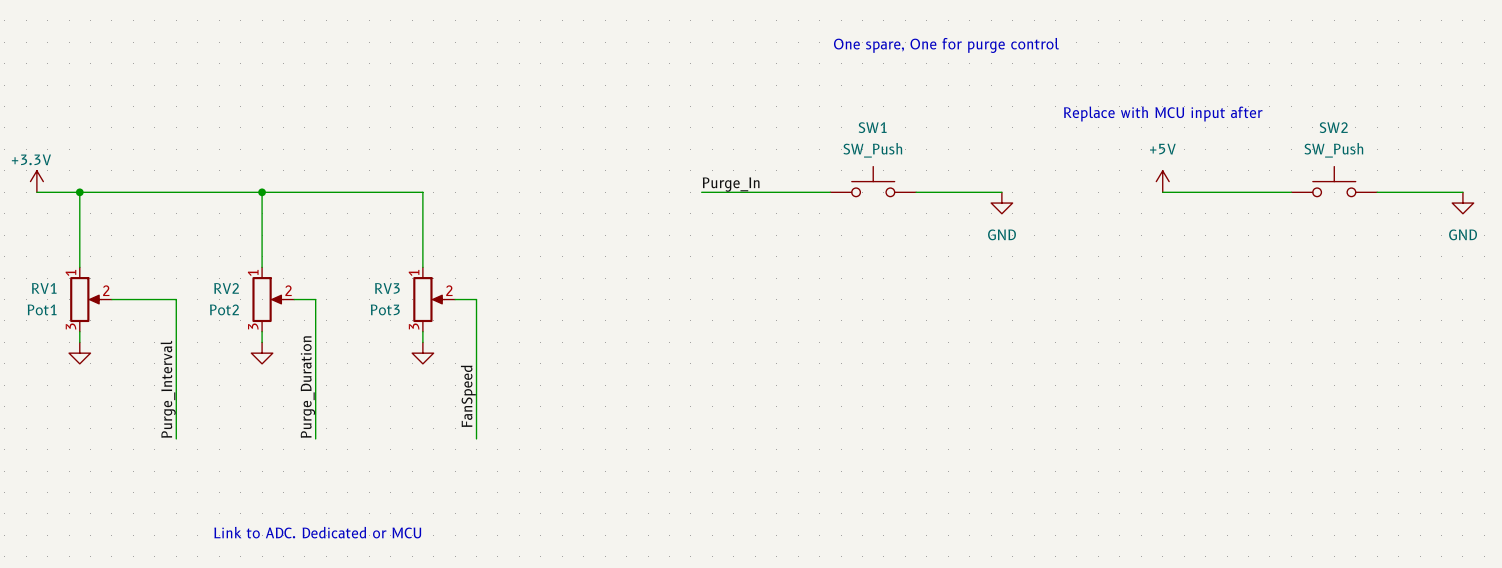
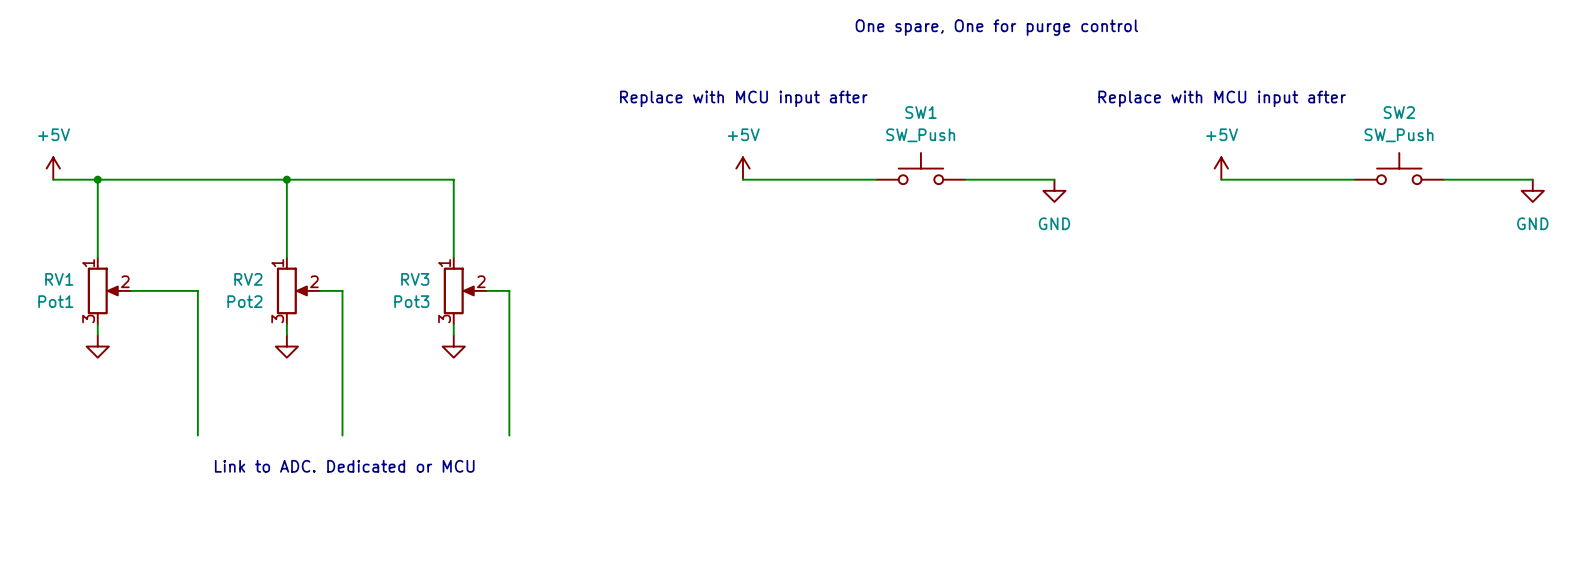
text: none -> Replace with MCU input after (743, 98)
power symbol: +3.3V (36, 181) -> +5V (53, 168)
power symbol: none -> +5V (742, 168)
label: Purge_In (731, 184) -> none
label: Purge_Duration (307, 387) -> none
label: Purge_Interval (168, 389) -> none
label: FanSpeed (468, 396) -> none
text position: Link to ADC. Dedicated or MCU (317, 532) -> Link to ADC. Dedicated or MCU (344, 466)

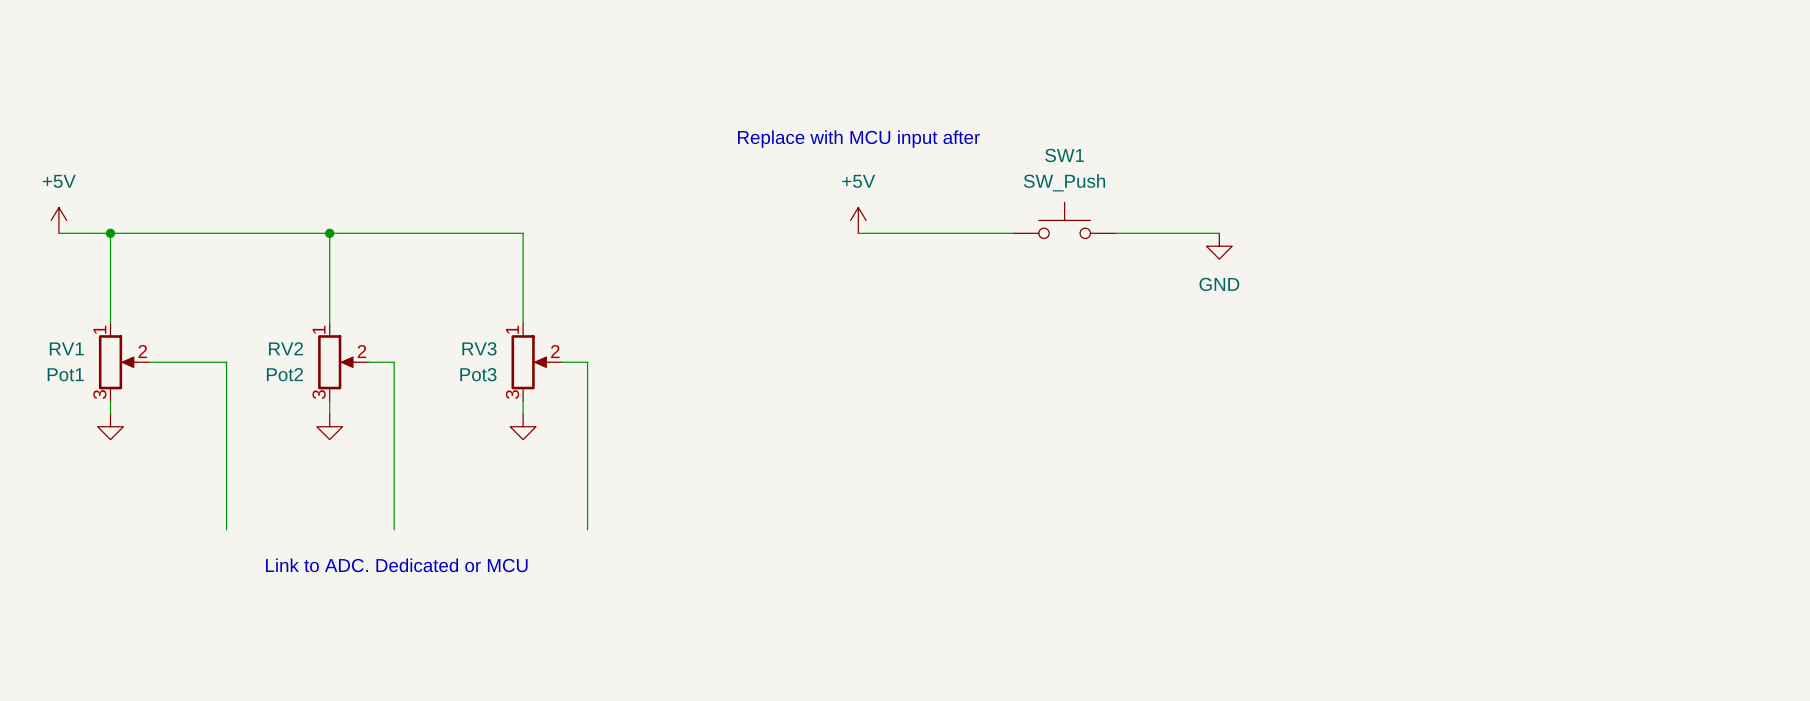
text: One spare, One for purge control (996, 27) -> none
text: Replace with MCU input after (1222, 98) -> none
power symbol: +5V (1221, 168) -> none
SW2: SW_Push (1399, 168) -> none
wire: (1221, 179) (1354, 179) -> none
wire: (1443, 179) (1532, 179) -> none
power symbol: GND (1532, 190) -> none

